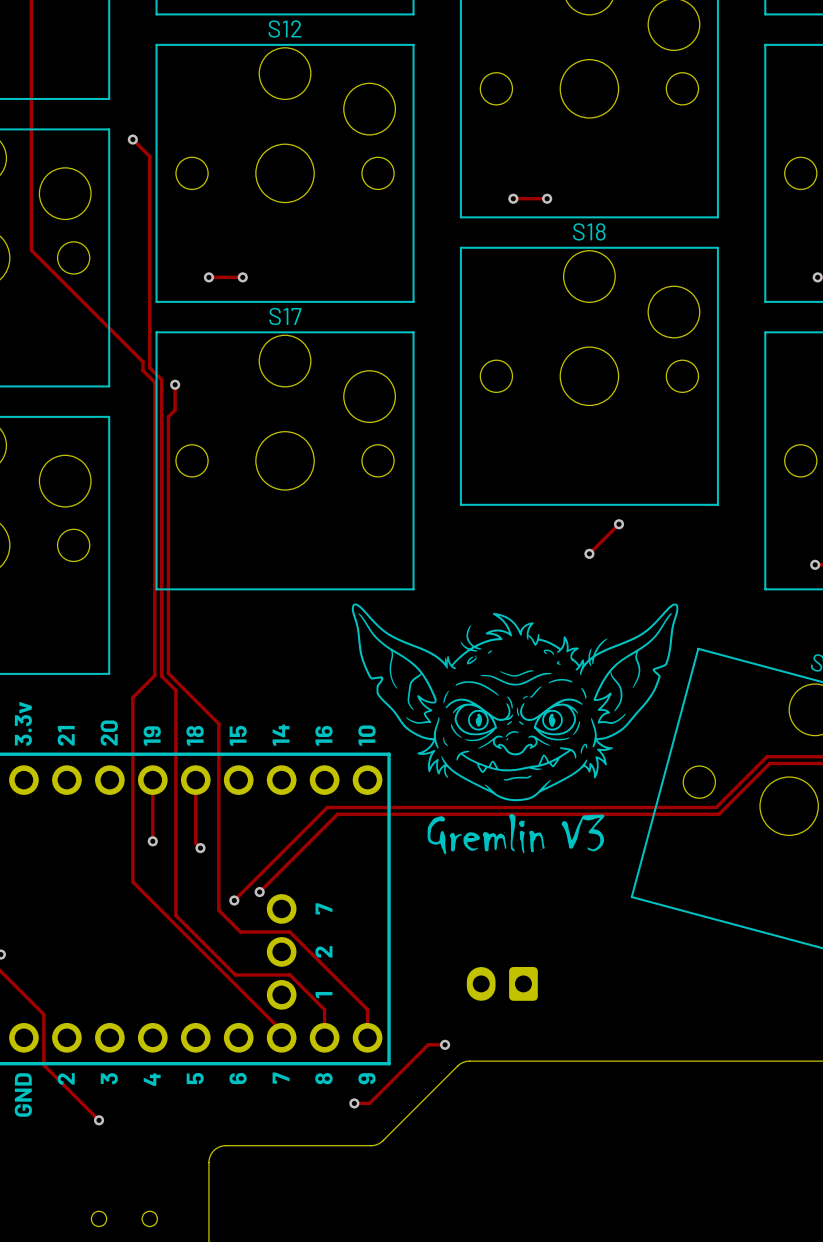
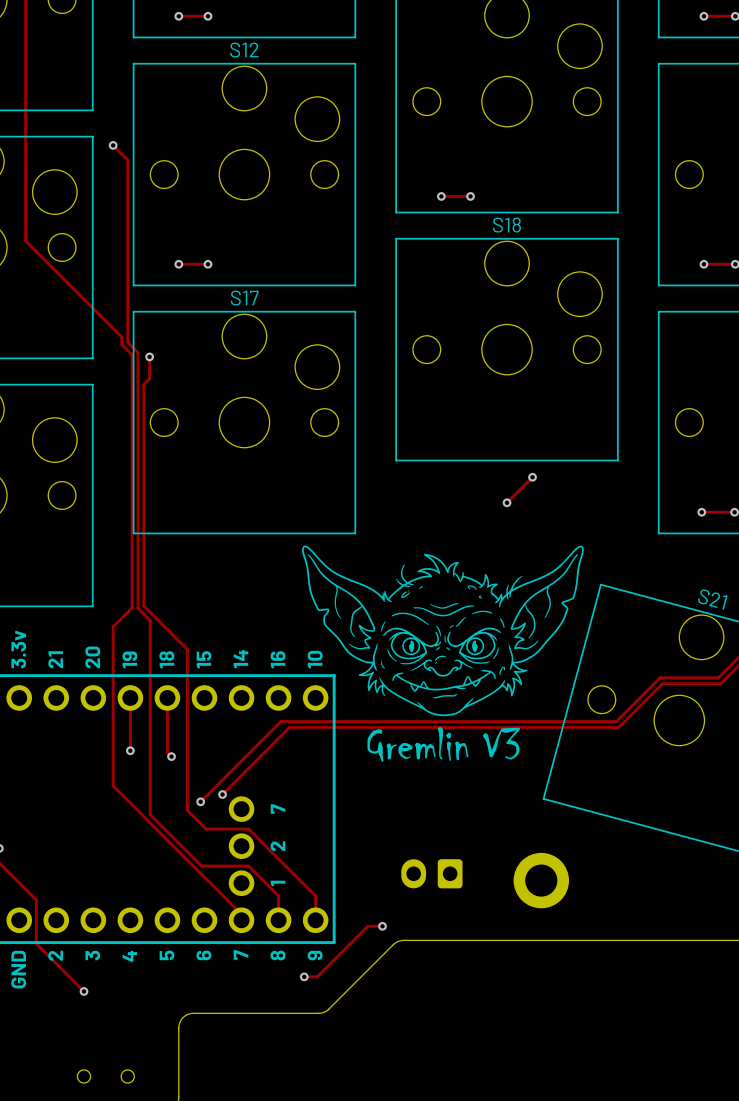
part: none -> (541, 880)

